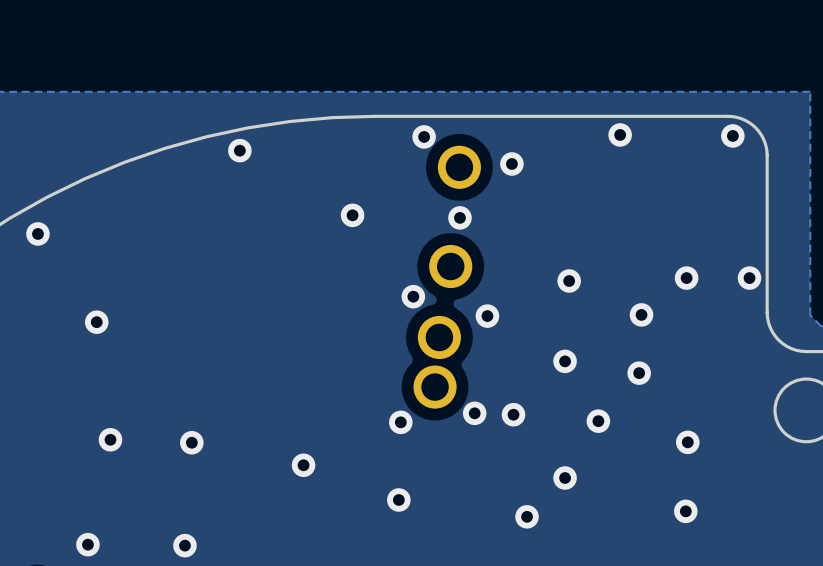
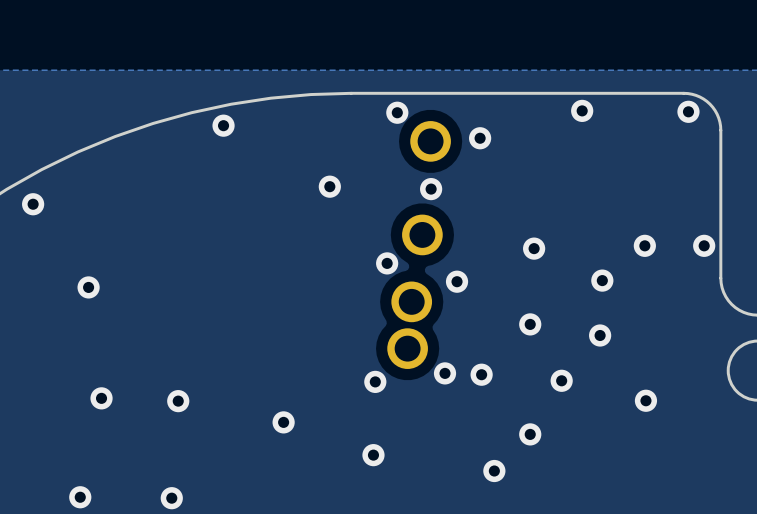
via: (685, 511) -> none

